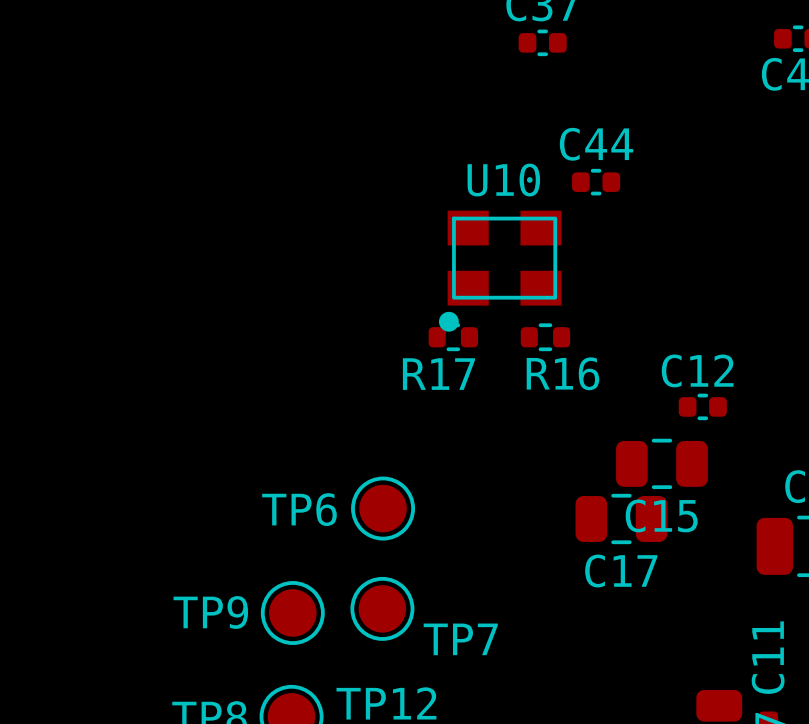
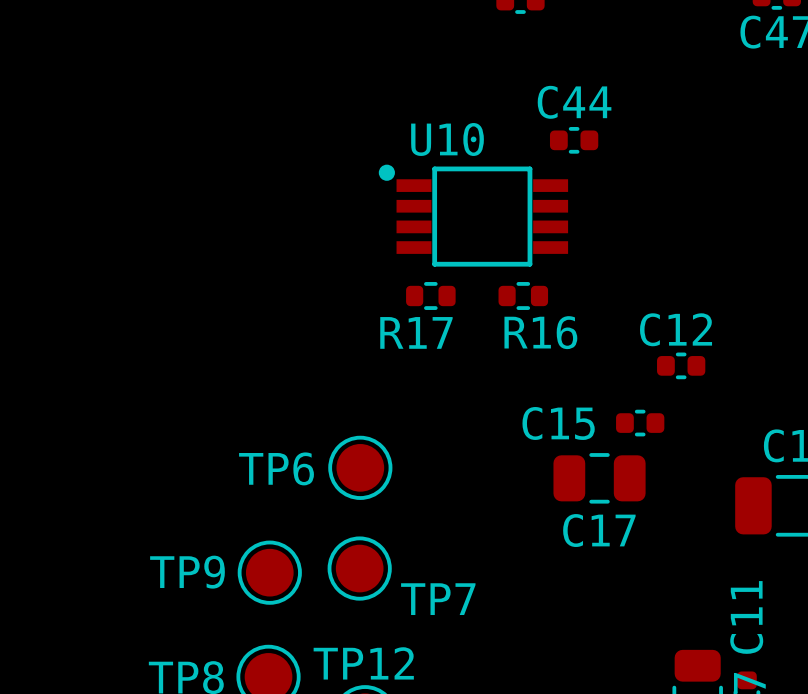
U10 footprint: [438, 210, 562, 332] -> [378, 164, 569, 267]
C15 footprint: [616, 438, 708, 490] -> [616, 409, 665, 437]
C15 name position: C15 (661, 515) -> C15 (558, 423)

